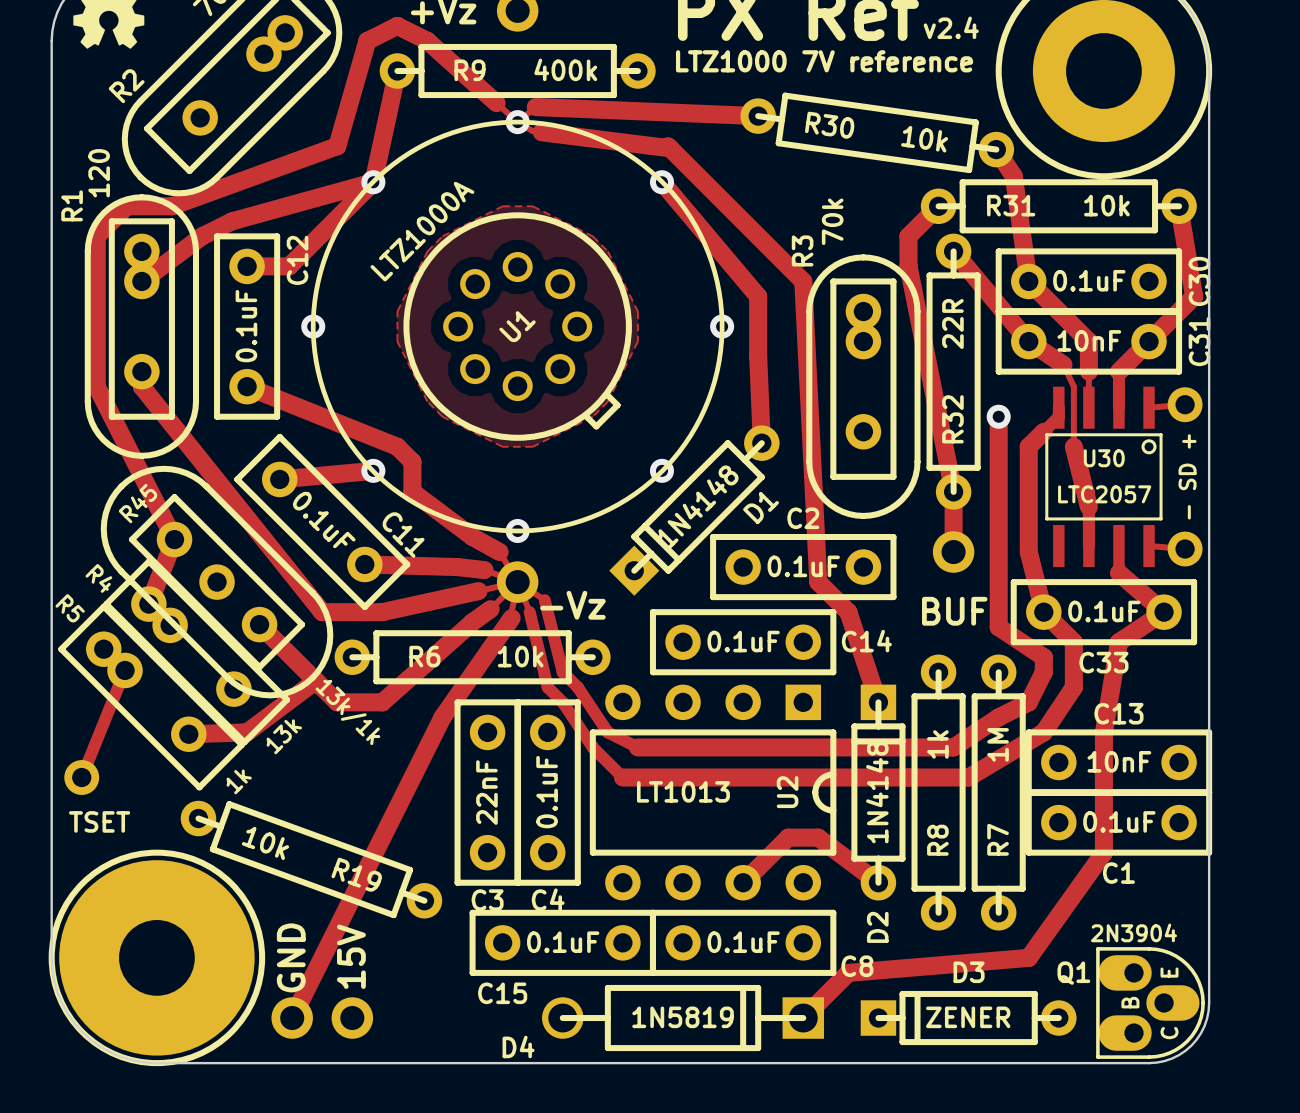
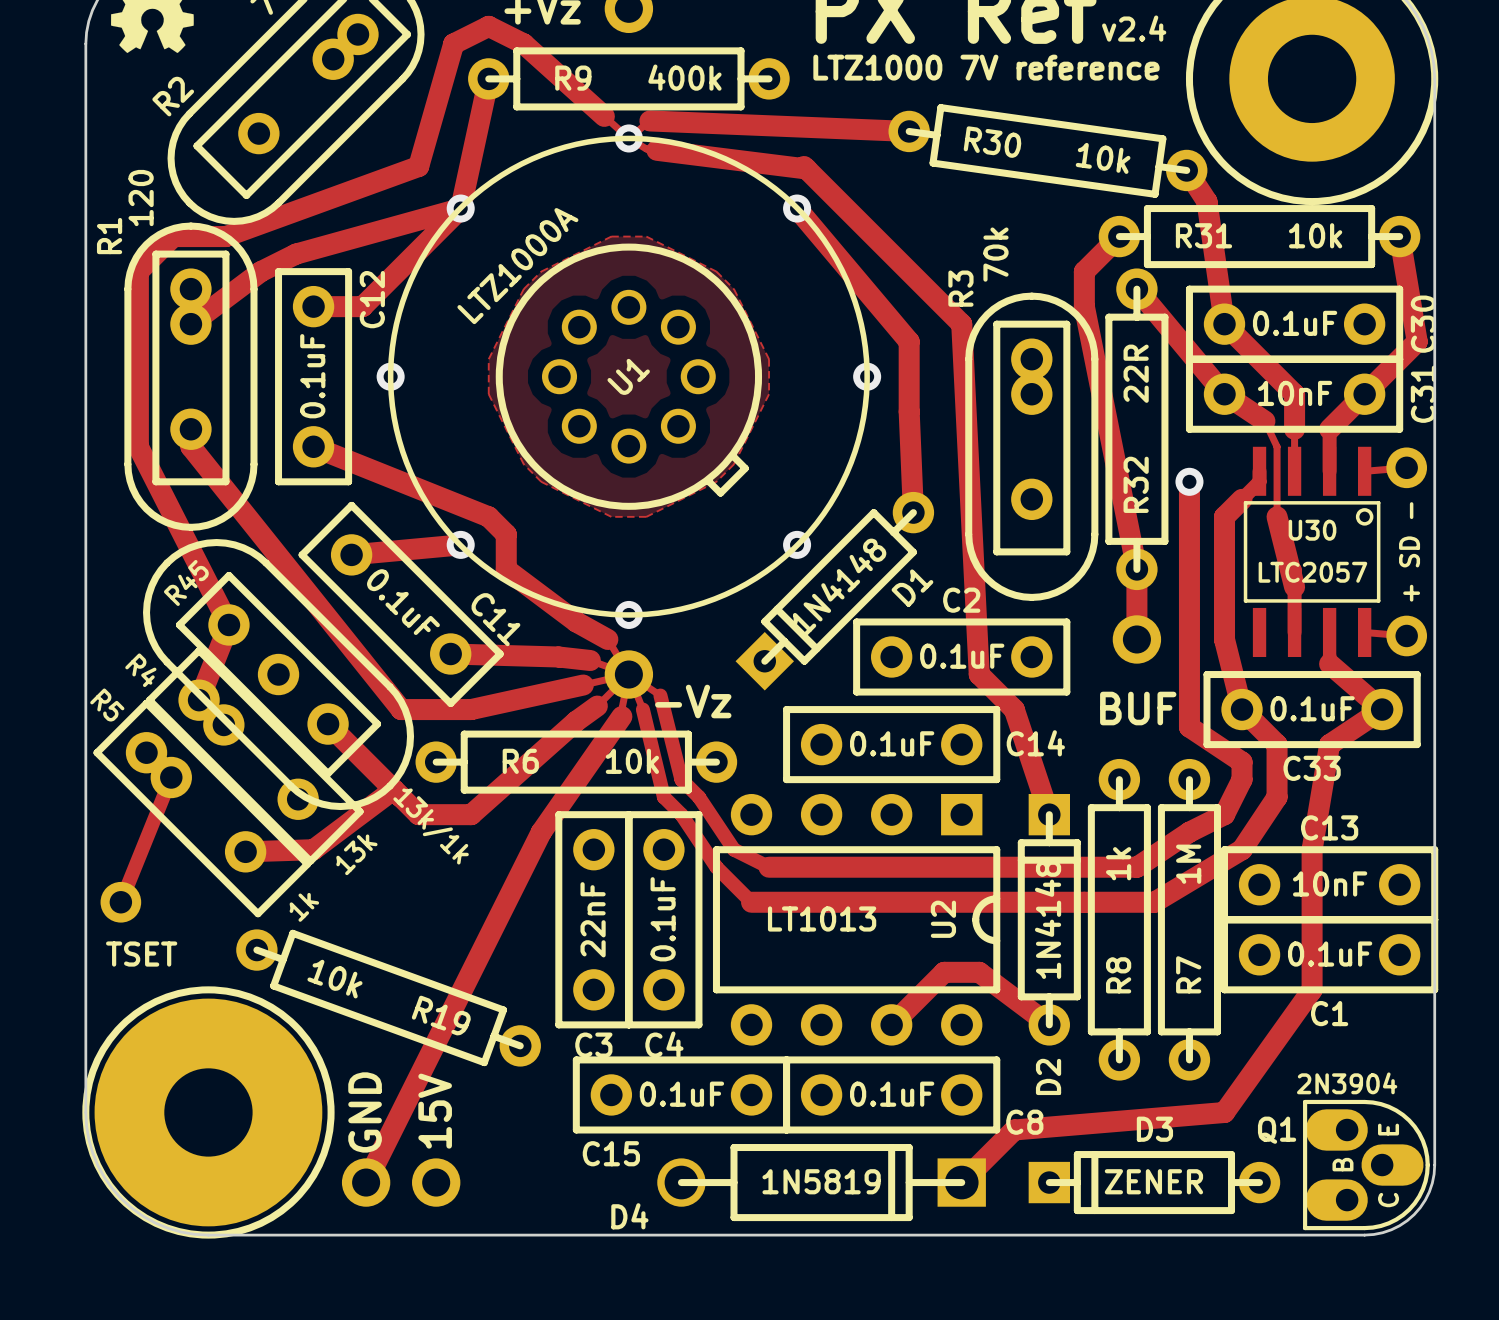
text: - SD + (1187, 476) -> + SD - (1409, 551)

